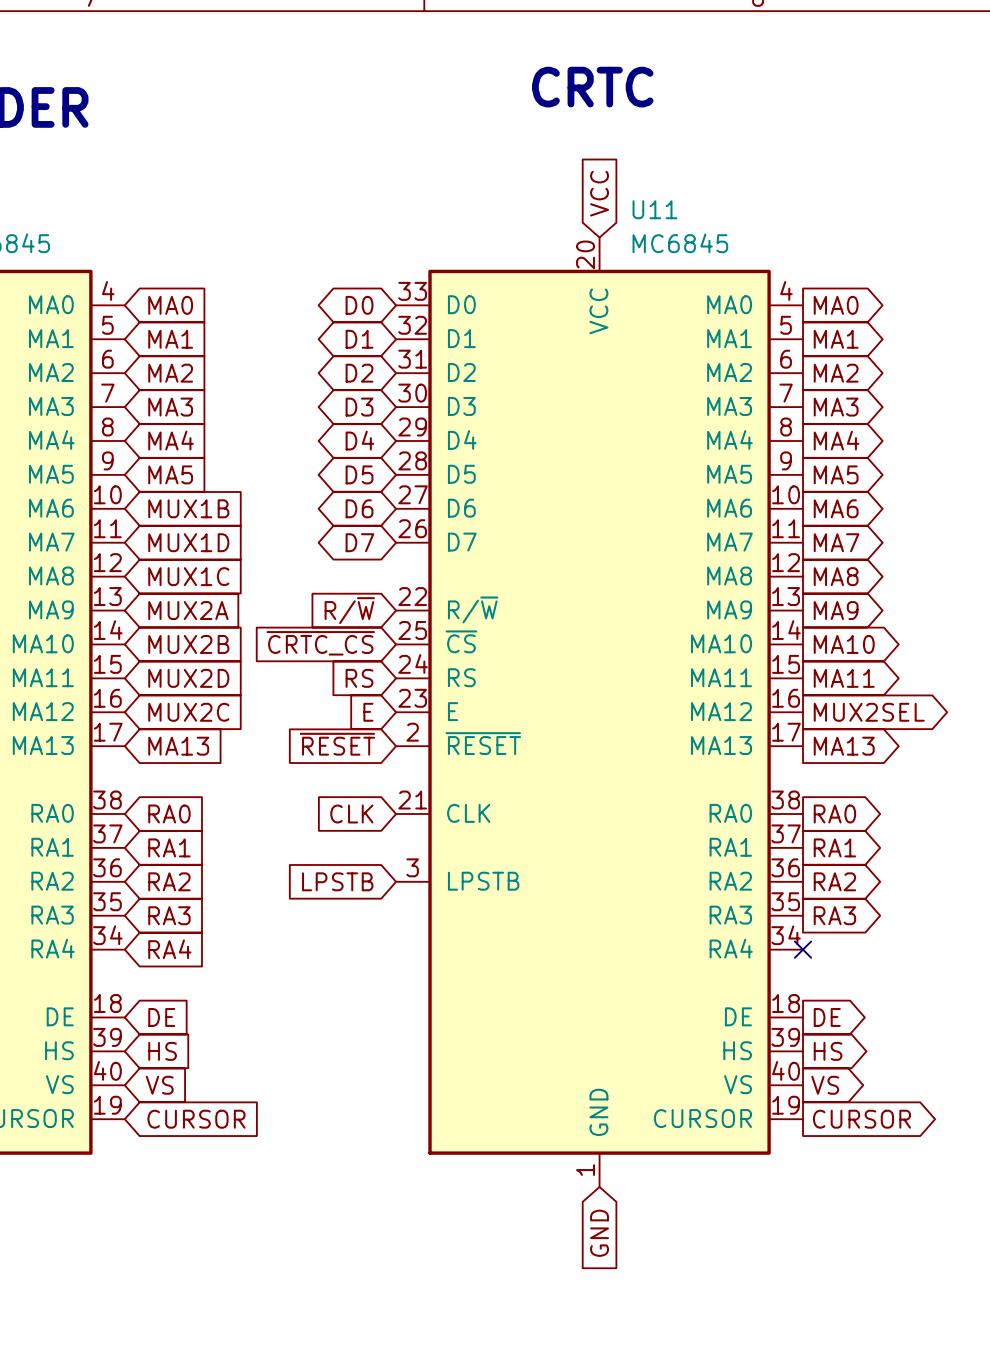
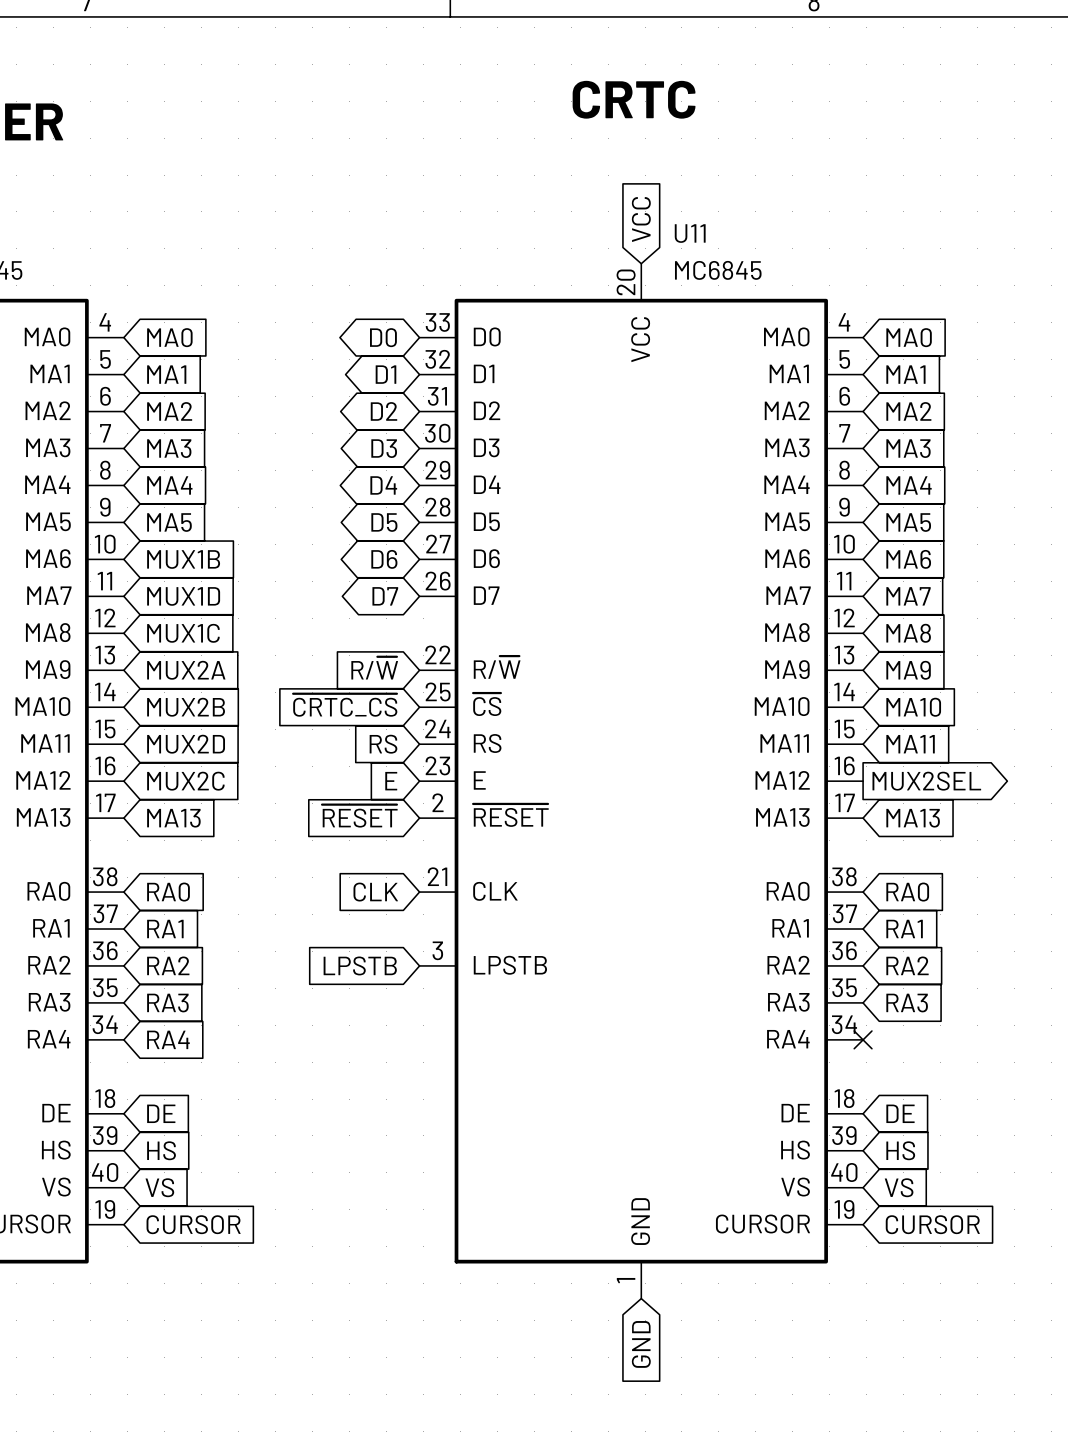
global label shape: output (836, 305) -> input (909, 337)
global label shape: output (836, 339) -> input (905, 374)
global label shape: output (836, 373) -> input (908, 411)
global label shape: output (836, 407) -> input (908, 448)
global label shape: output (836, 440) -> input (909, 485)
global label shape: output (836, 474) -> input (908, 522)
global label shape: output (836, 508) -> input (908, 559)
global label shape: output (836, 542) -> input (908, 596)
global label shape: output (836, 576) -> input (908, 633)
global label shape: output (836, 610) -> input (908, 670)
global label shape: output (844, 644) -> input (913, 707)
global label shape: output (844, 678) -> input (910, 744)
global label shape: output (844, 746) -> input (913, 818)
global label shape: output (834, 814) -> input (907, 892)
global label shape: output (834, 847) -> input (904, 929)
global label shape: output (834, 881) -> input (907, 965)
global label shape: output (834, 915) -> input (907, 1003)
global label shape: output (827, 1017) -> input (900, 1113)
global label shape: output (828, 1051) -> input (900, 1150)
global label shape: output (825, 1085) -> input (899, 1187)
global label shape: output (861, 1119) -> input (932, 1224)

